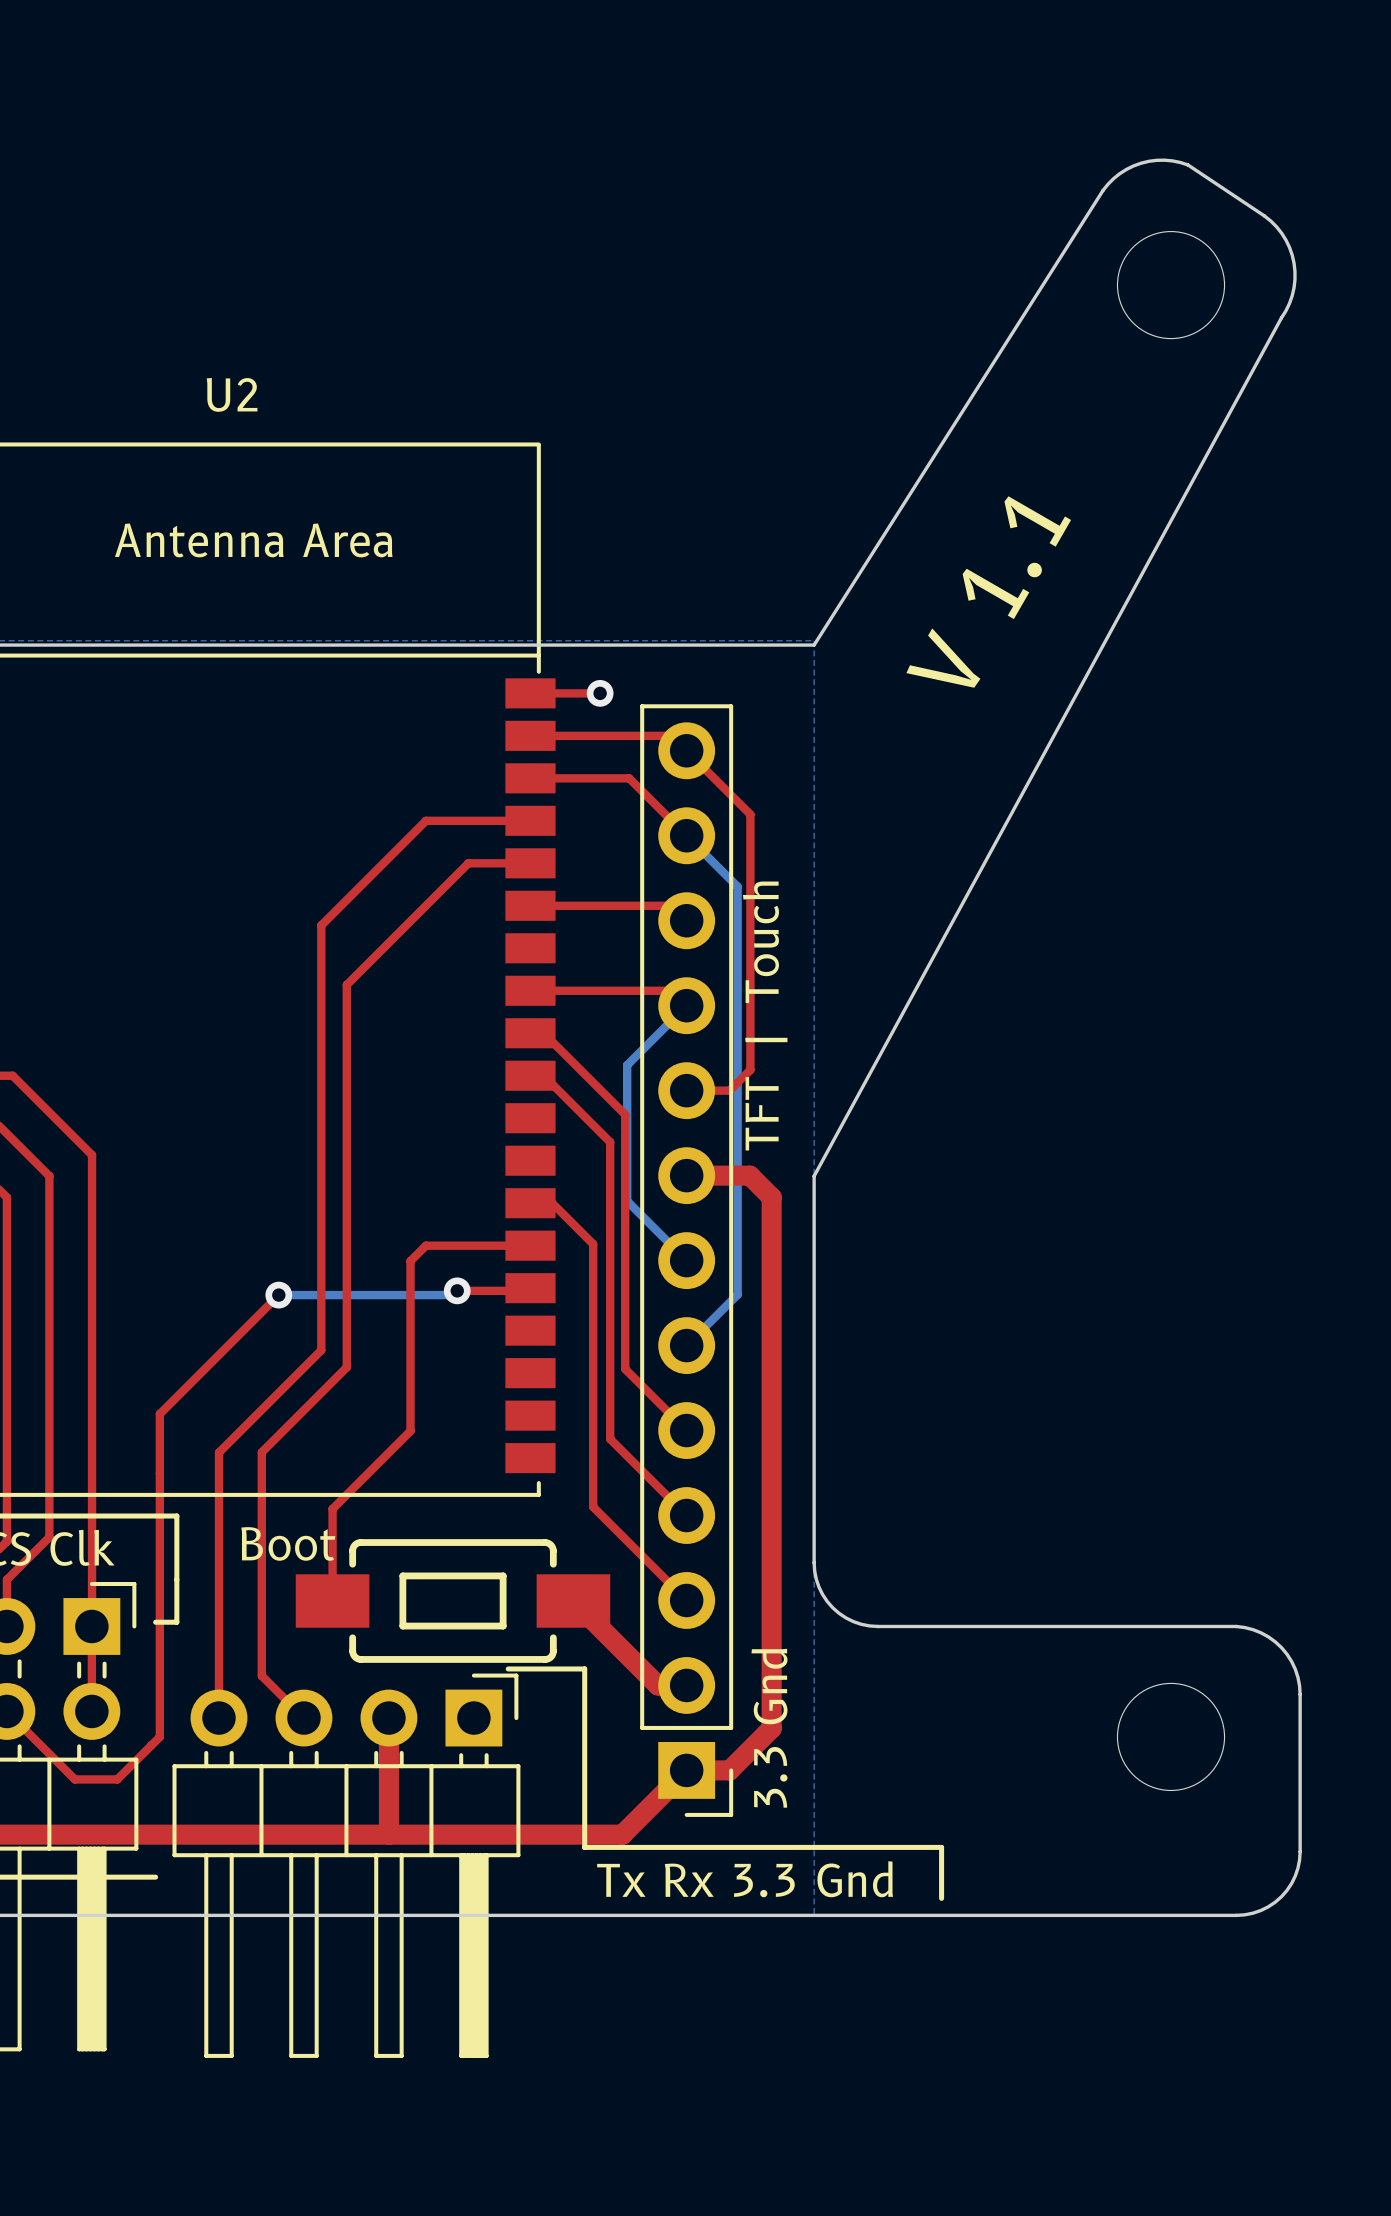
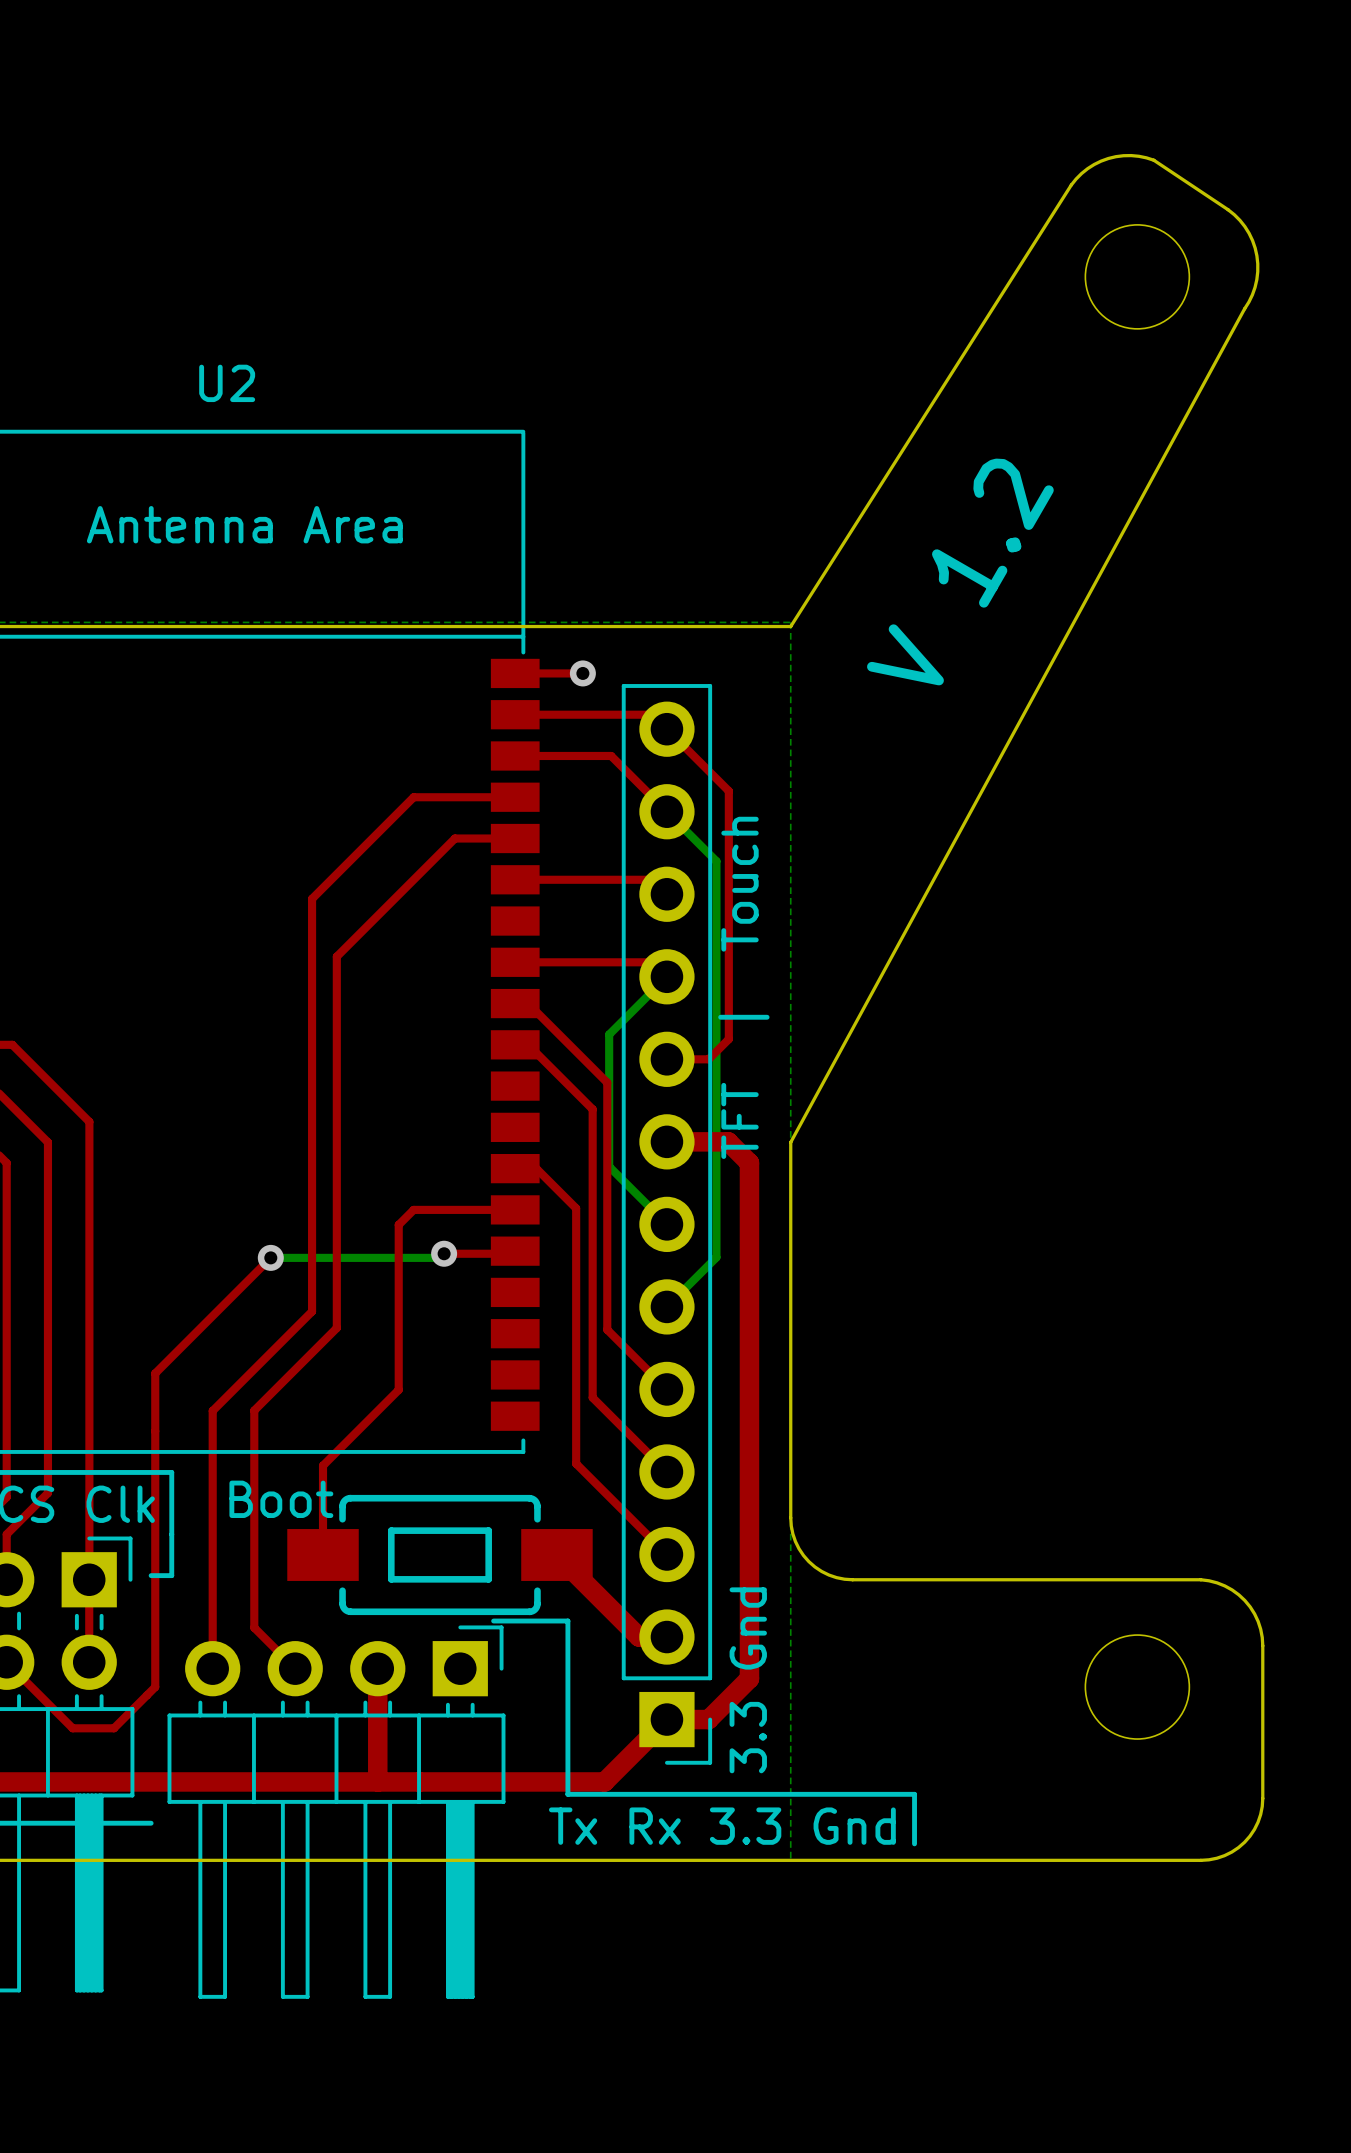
text: V 1.1 (988, 592) -> V 1.2 (960, 571)

